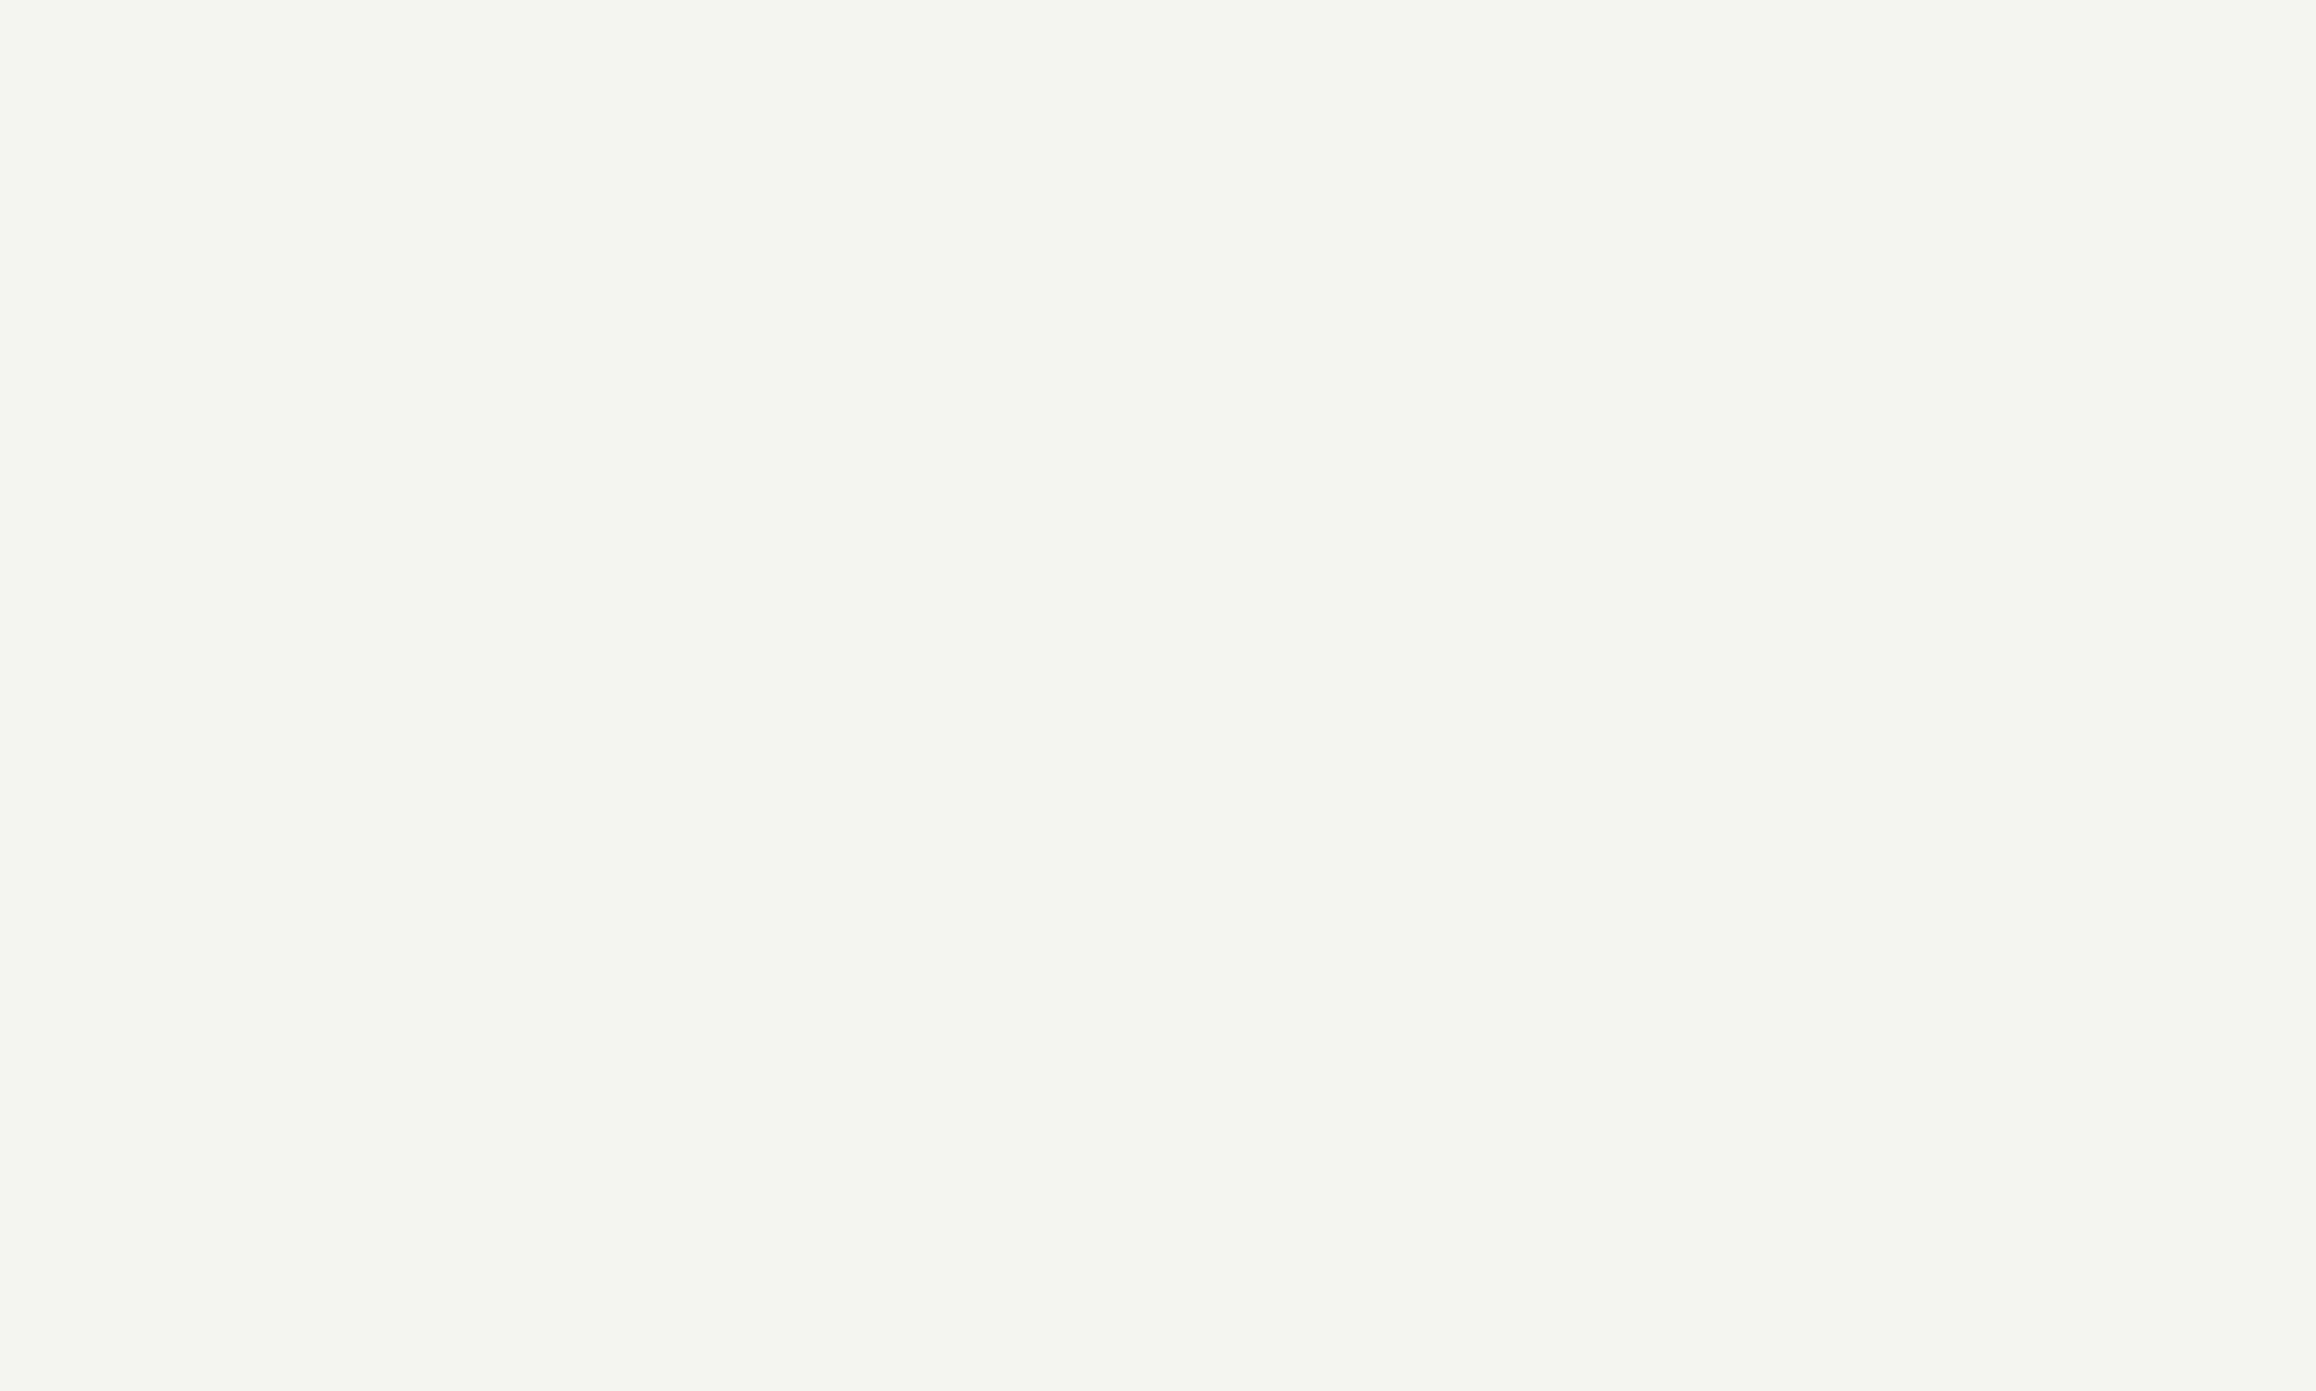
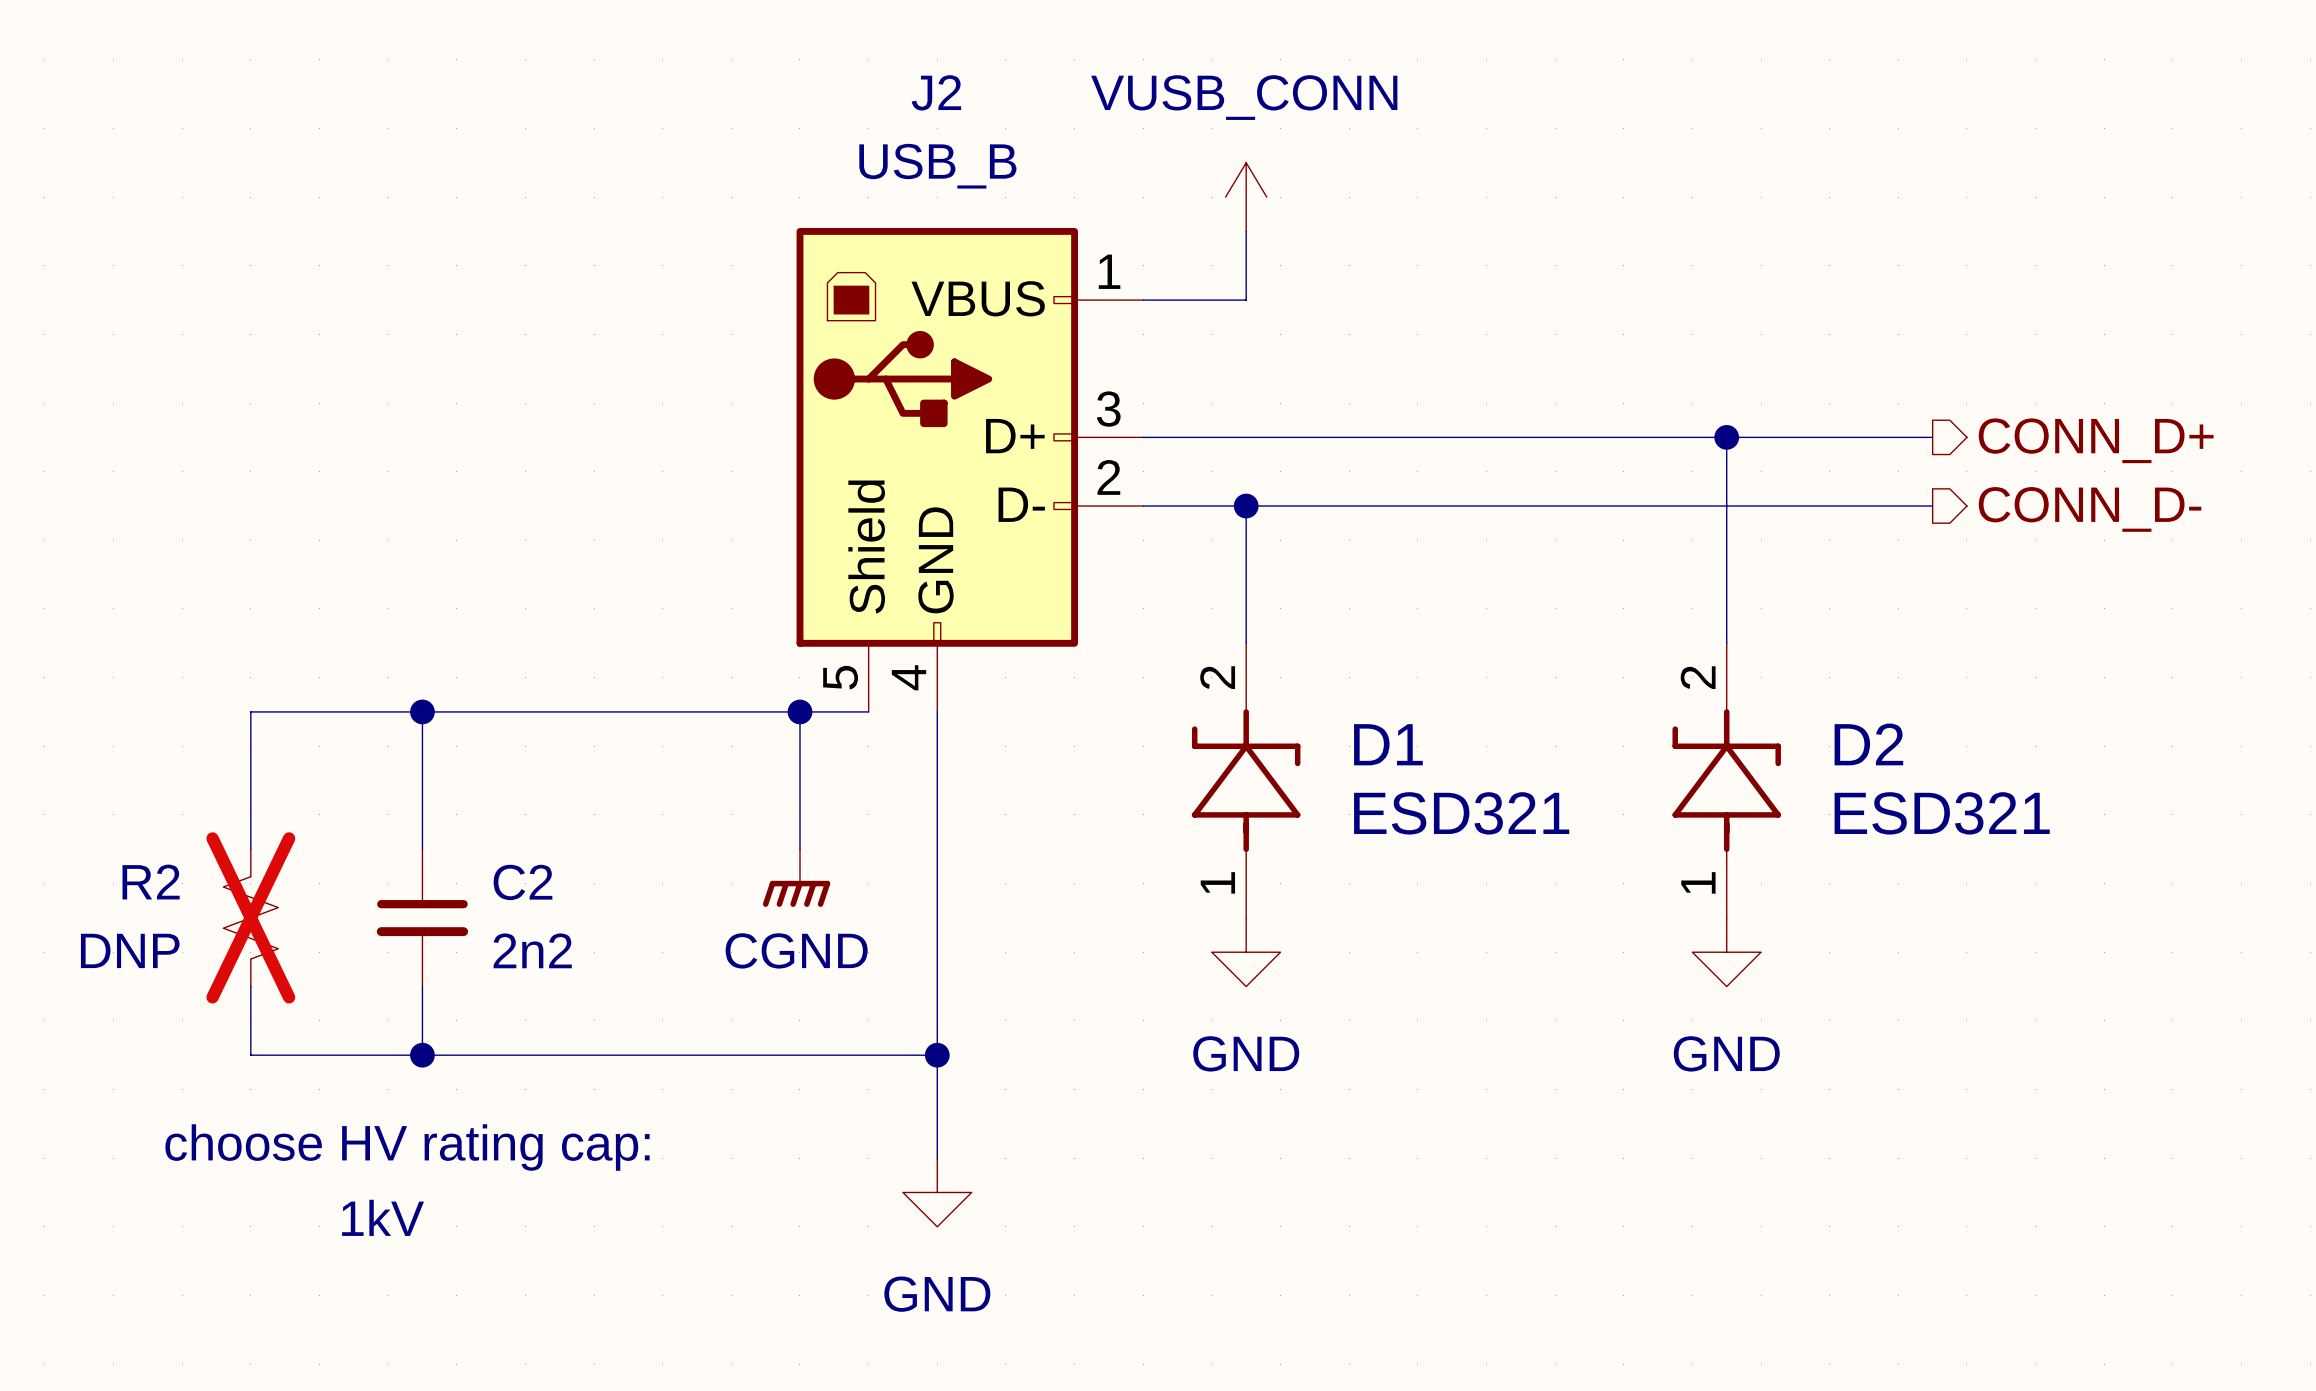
power symbol: none -> VUSB_CONN (1246, 197)
wire: none -> (1246, 231) (1246, 300) (1143, 300)
wire: none -> (1143, 437) (1932, 437)
wire: none -> (1726, 437) (1726, 643)
junction: none -> (1726, 437)
hierarchical label: none -> CONN_D+ (2096, 440)
J2: none -> USB_B (969, 469)
wire: none -> (1143, 506) (1932, 506)
wire: none -> (1246, 506) (1246, 643)
junction: none -> (1246, 506)
hierarchical label: none -> CONN_D- (2090, 509)
wire: none -> (422, 711) (422, 849)
junction: none -> (422, 711)
wire: none -> (799, 711) (799, 849)
junction: none -> (799, 711)
wire: none -> (868, 711) (250, 711) (250, 849)
wire: none -> (937, 711) (937, 1158)
D1: none -> ESD321 (1246, 780)
D2: none -> ESD321 (1726, 780)
power symbol: none -> CGND (796, 878)
R2: none -> DNP (250, 917)
C2: none -> 2n2 (422, 917)
power symbol: none -> GND (1246, 952)
power symbol: none -> GND (1726, 952)
wire: none -> (250, 986) (250, 1055) (937, 1055)
wire: none -> (422, 986) (422, 1055)
junction: none -> (422, 1055)
junction: none -> (937, 1055)
text: none -> choose HV rating cap: (407, 1147)
power symbol: none -> GND (937, 1192)
text: none -> 1kV (383, 1217)

